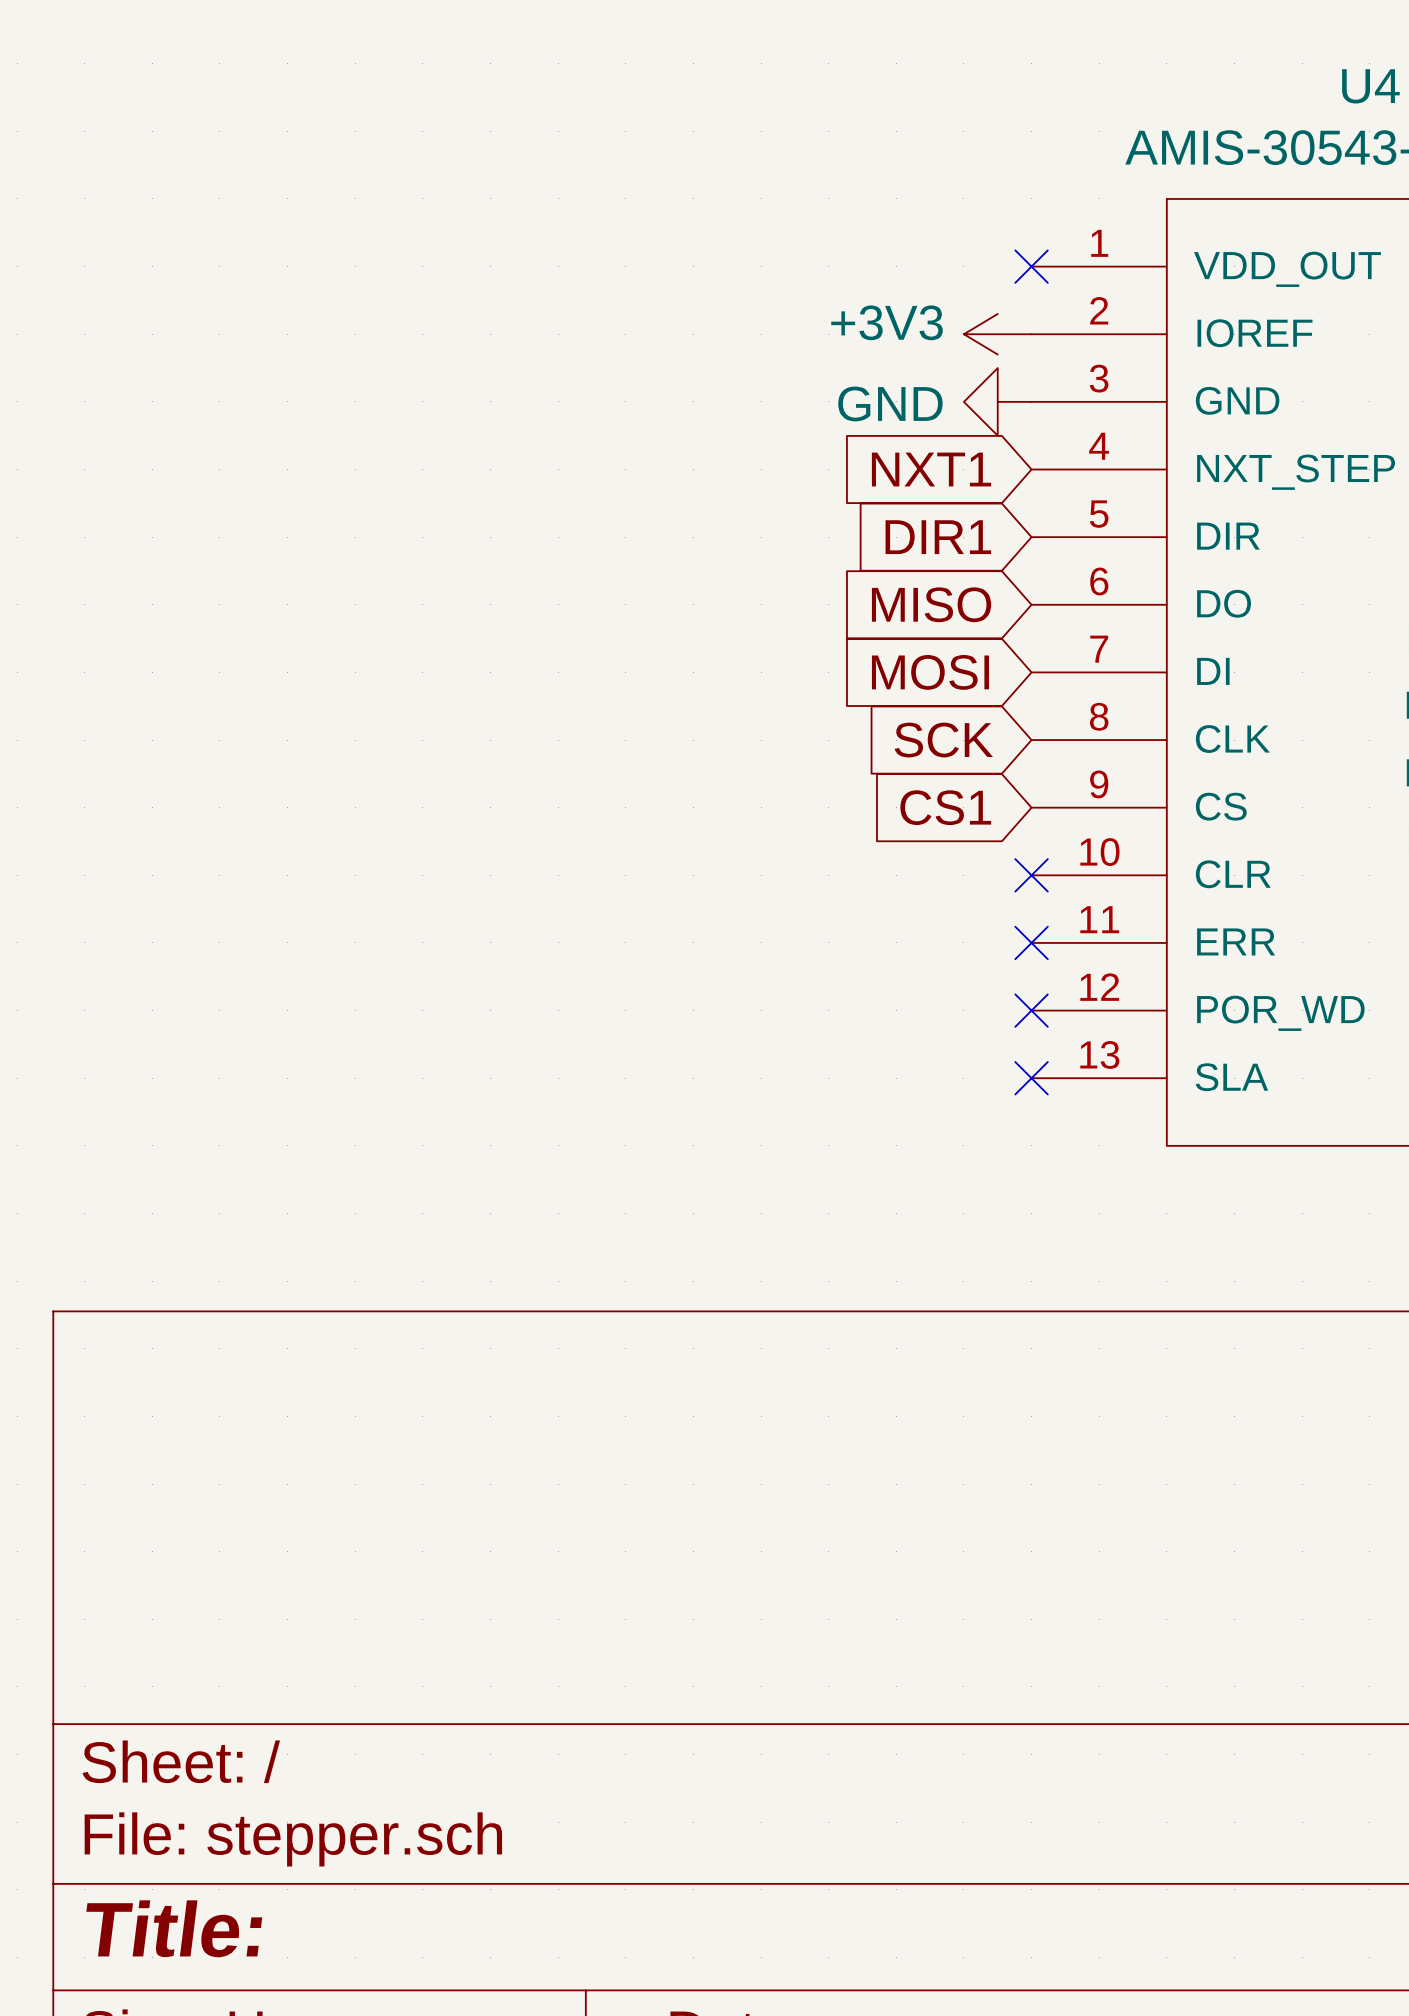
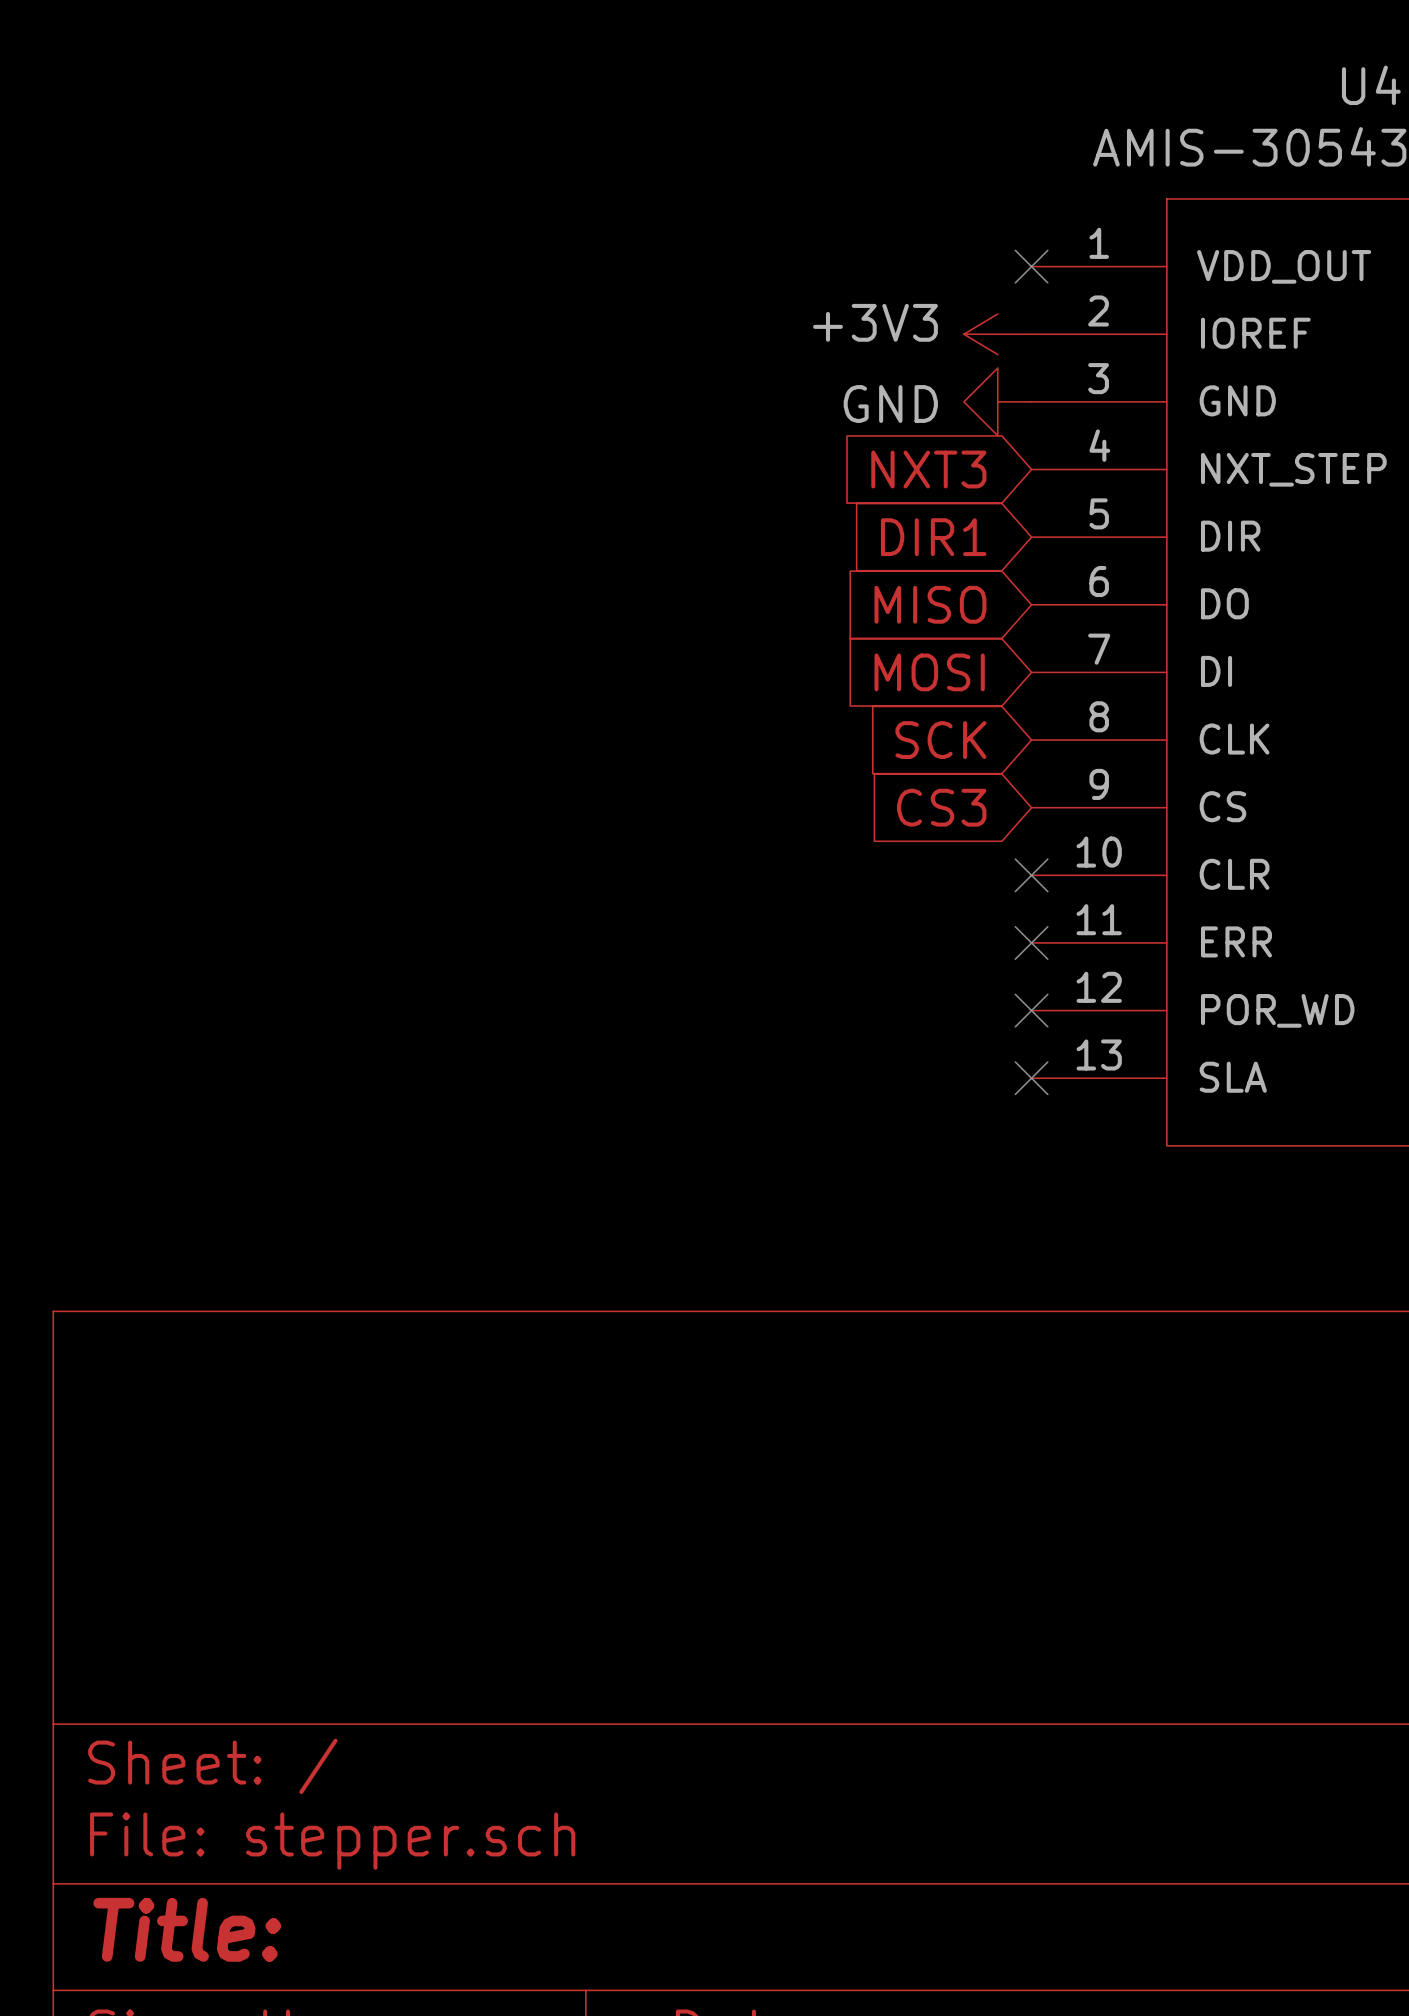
global label: NXT1 (931, 469) -> NXT3 (928, 469)
global label: CS1 (945, 807) -> CS3 (941, 807)

